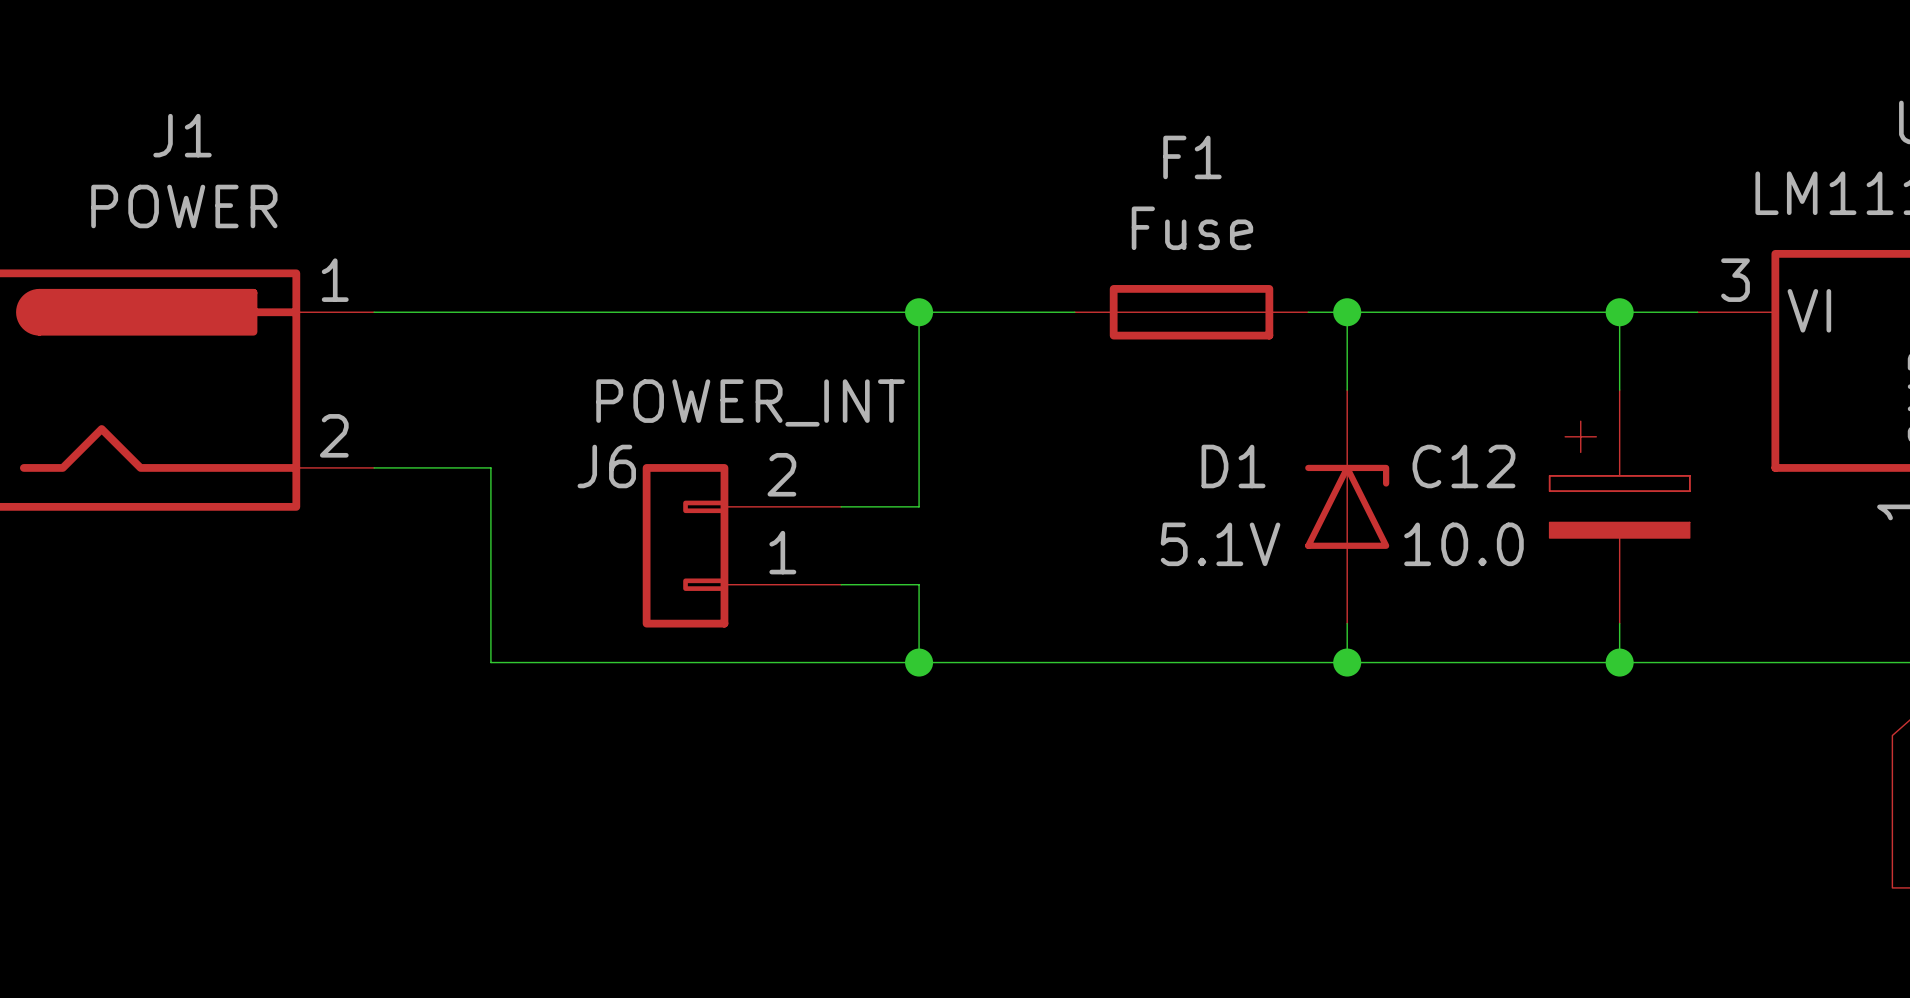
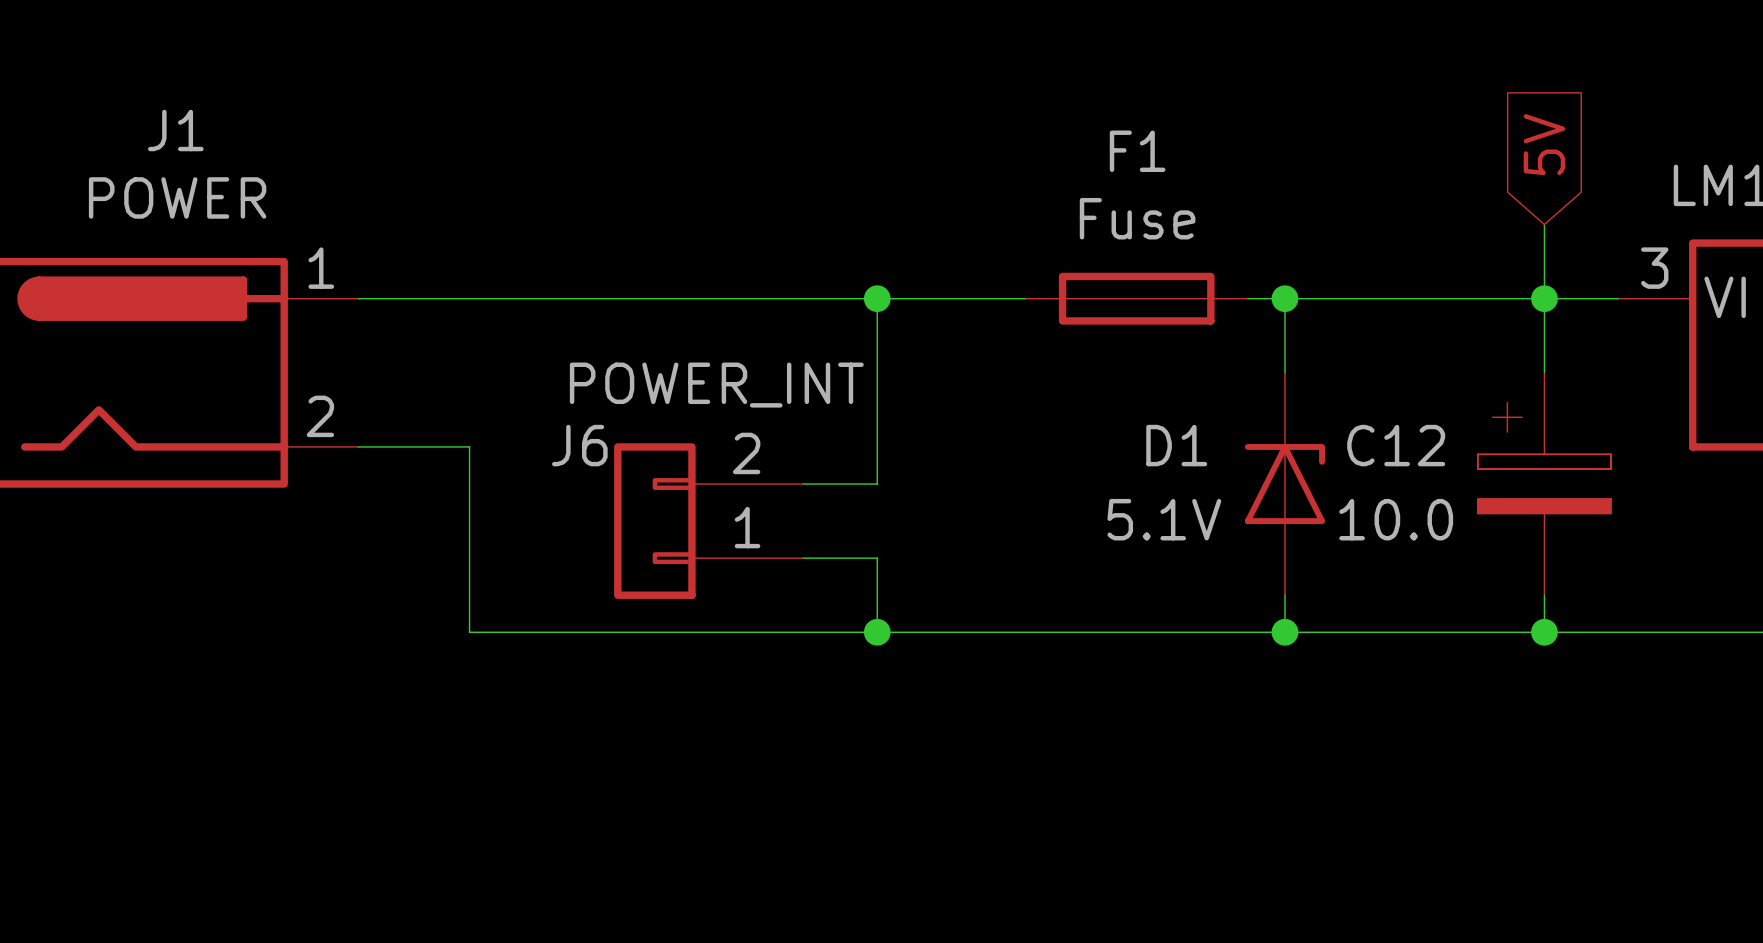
global label: none -> 5V (1544, 144)
wire: none -> (1544, 224) (1544, 298)

